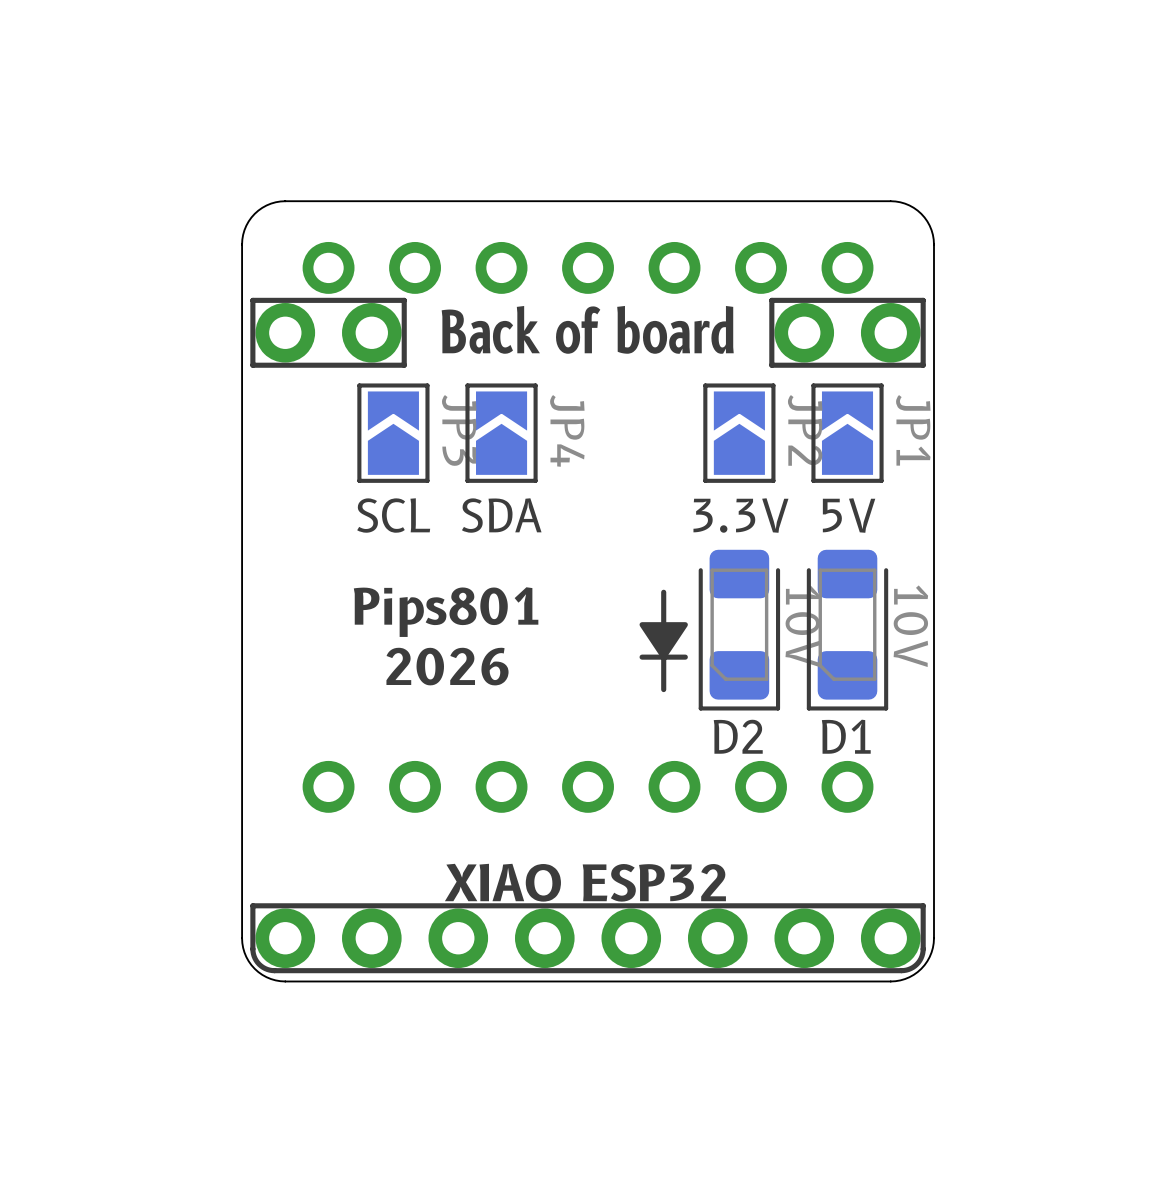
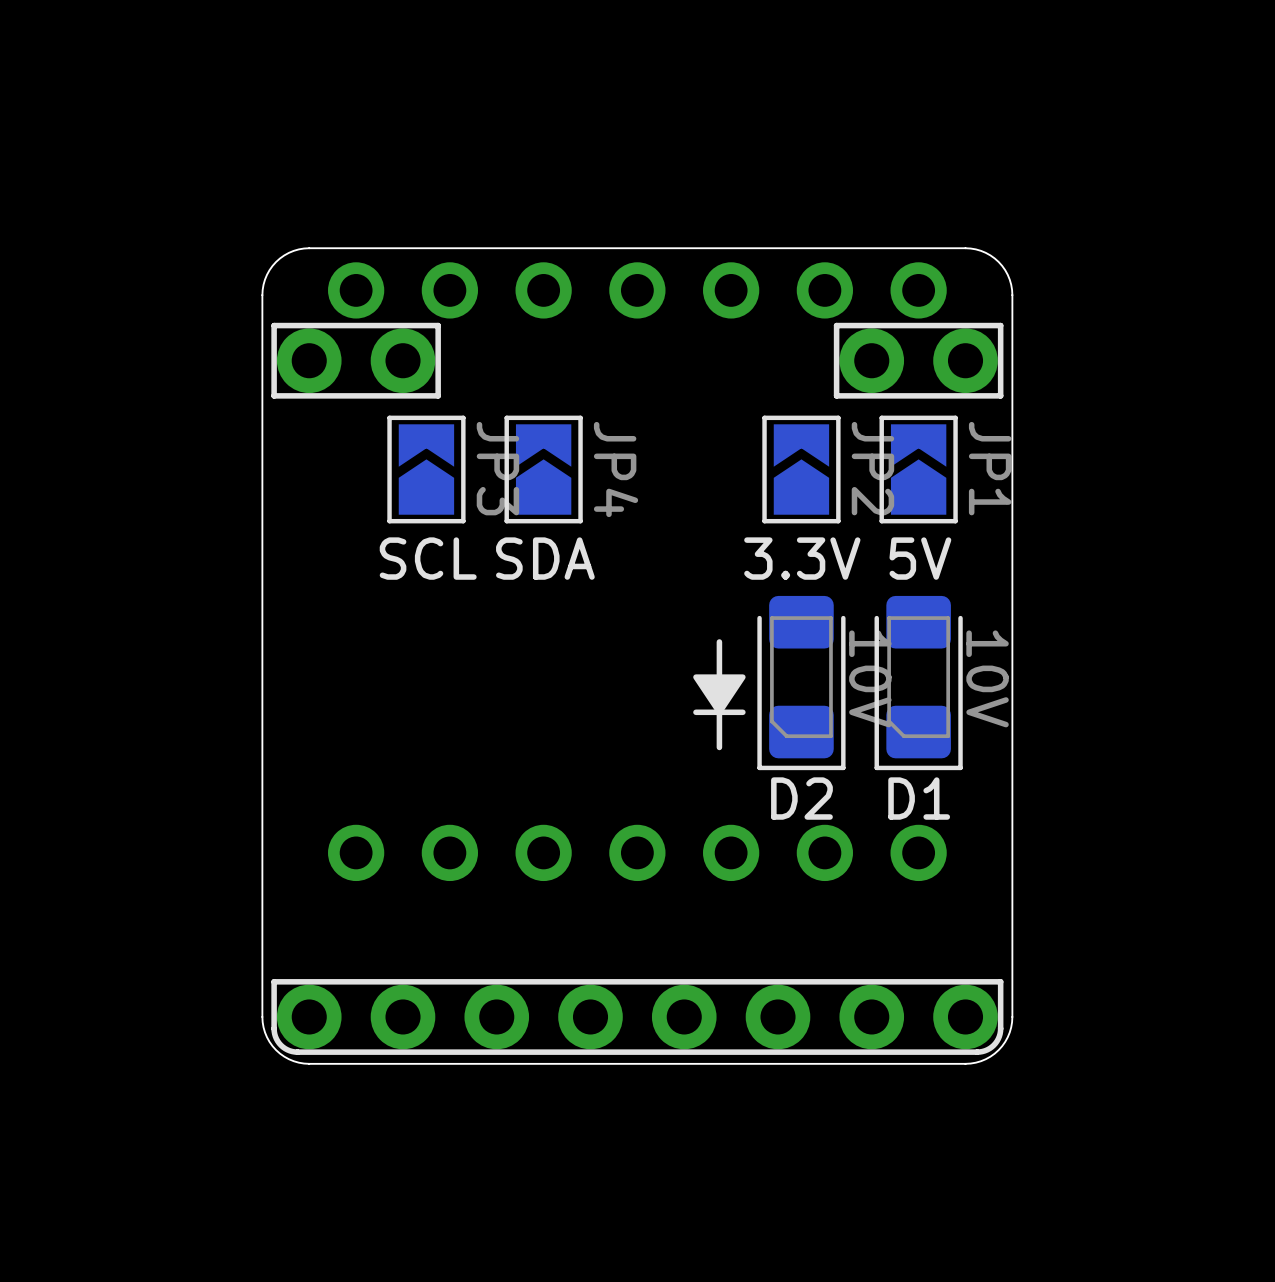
board edge: (285, 201) (266, 205) (258, 210) (248, 221) (242, 239) (242, 272) -> (1012, 295) (1009, 279) (998, 261) (985, 252) (965, 248) (304, 248) (288, 252) (272, 265) (265, 279) (262, 295)
board edge: (890, 201) (909, 205) (917, 210) (927, 221) (933, 239) (933, 272) -> none
board edge: (890, 201) (285, 201) -> none
text: Back of board (587, 329) -> none
text: Pips801 (446, 612) -> none
text: 2026 (447, 666) -> none
text: XIAO ESP32 (585, 882) -> none

